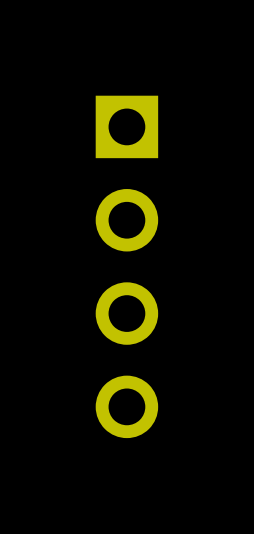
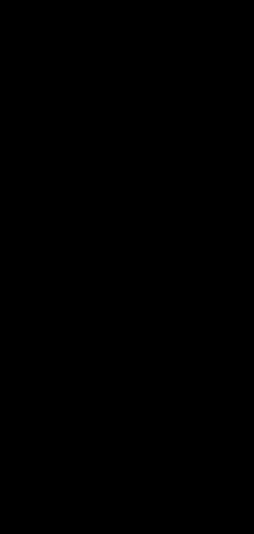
part: (126, 266) -> none

